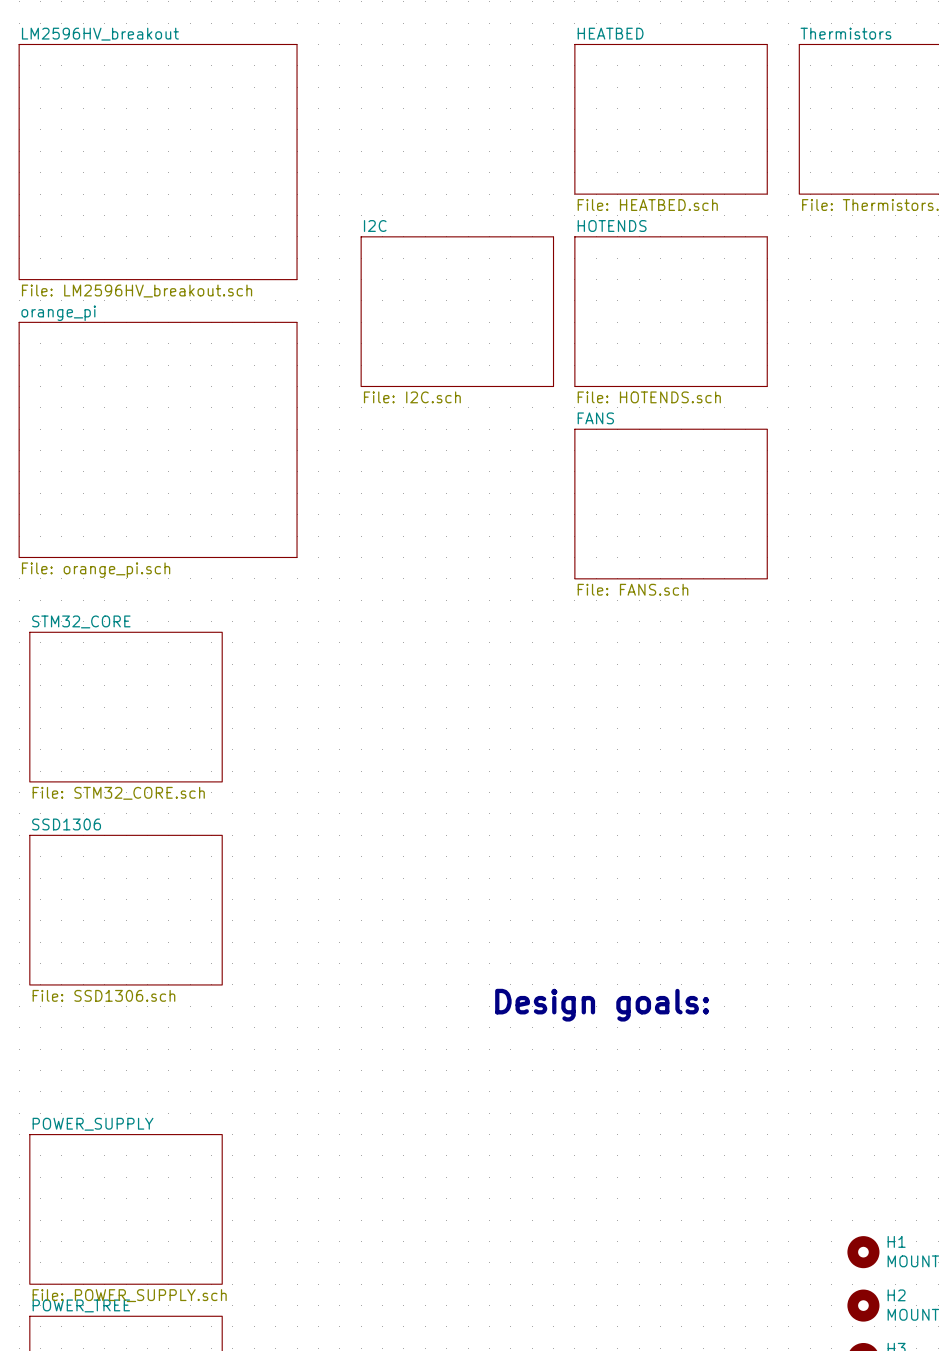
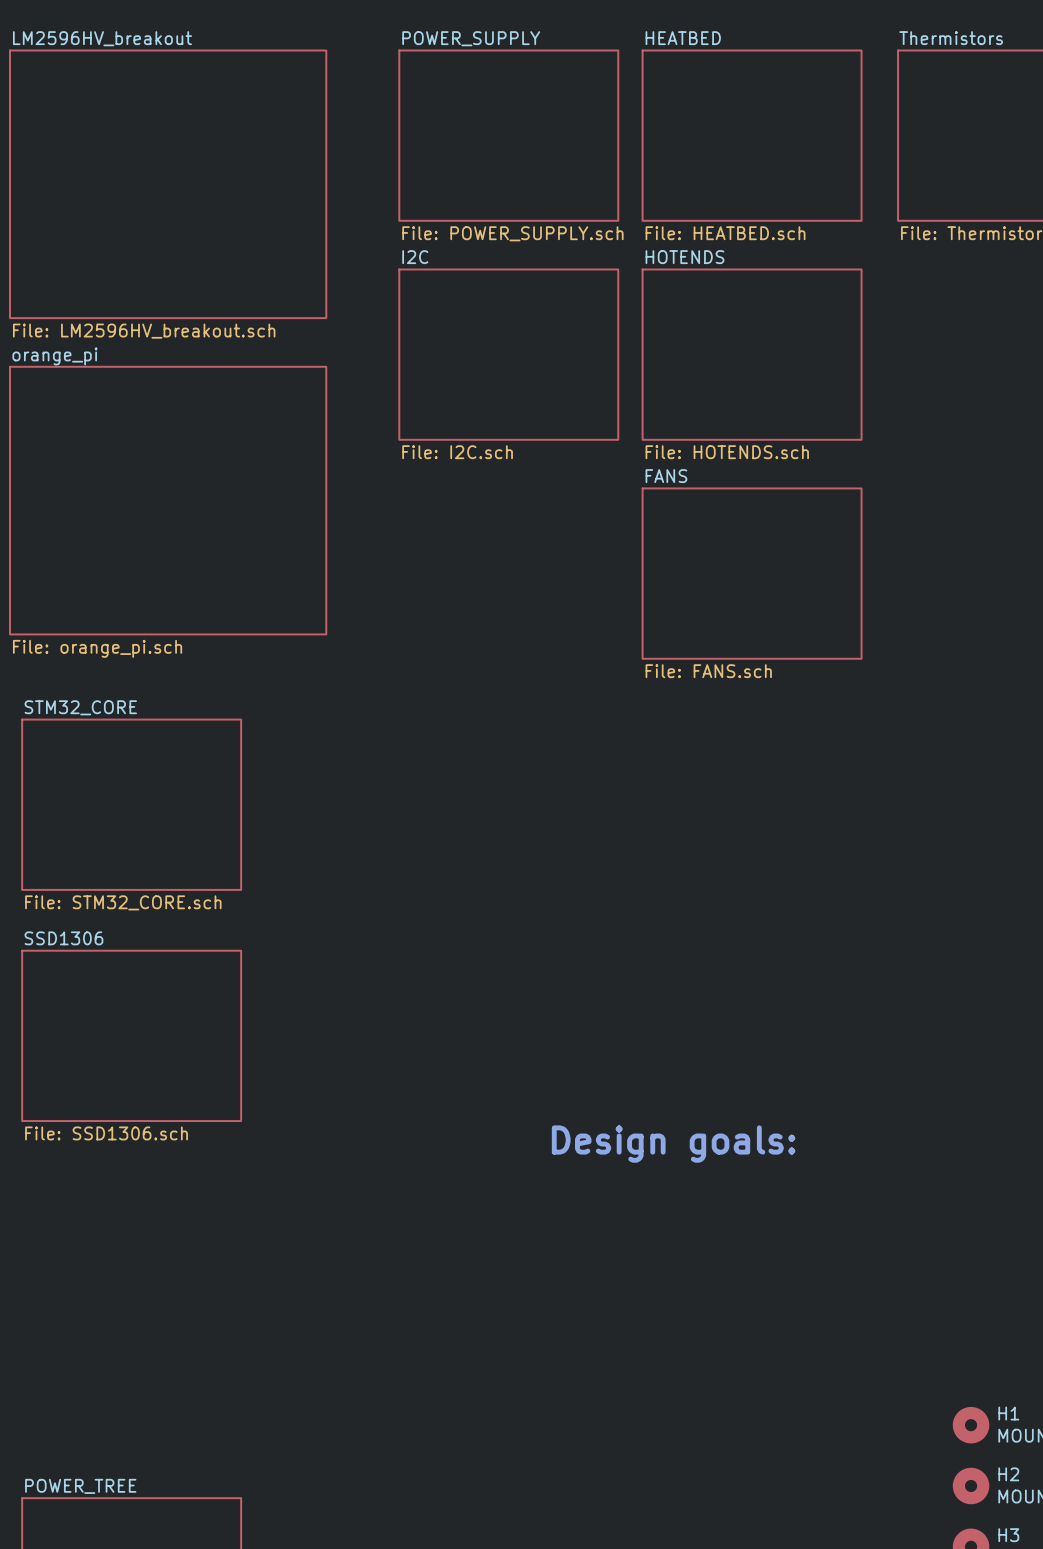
sheet POWER_SUPPLY: none -> File: POWER_SUPPLY.sch (508, 135)
sheet POWER_SUPPLY: File: POWER_SUPPLY.sch (126, 1209) -> none

